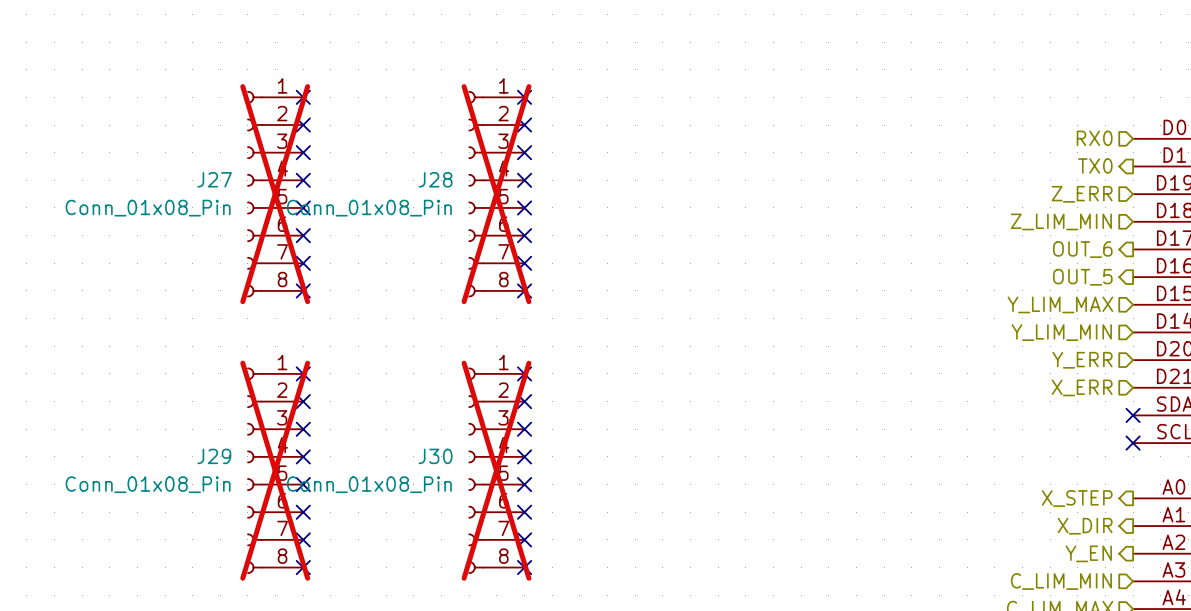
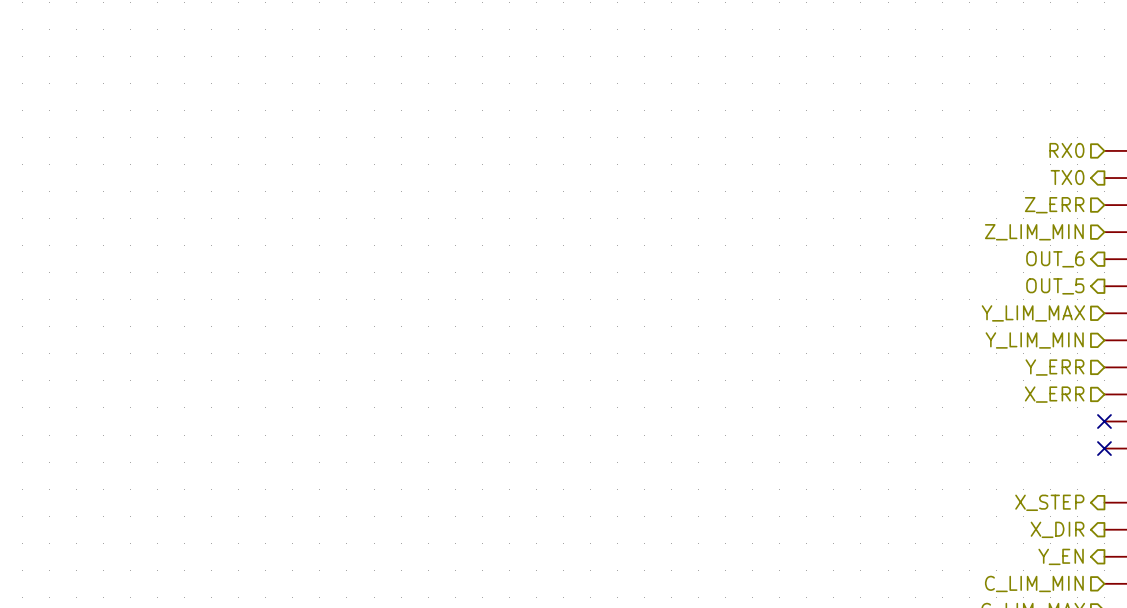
no-connect mark: (303, 97) -> none
no-connect mark: (524, 97) -> none
no-connect mark: (303, 125) -> none
no-connect mark: (524, 125) -> none
no-connect mark: (303, 152) -> none
no-connect mark: (524, 152) -> none
no-connect mark: (303, 180) -> none
no-connect mark: (524, 180) -> none
J27: Conn_01x08_Pin (275, 194) -> none
J28: Conn_01x08_Pin (496, 194) -> none
no-connect mark: (303, 207) -> none
no-connect mark: (524, 207) -> none
no-connect mark: (303, 235) -> none
no-connect mark: (524, 235) -> none
no-connect mark: (303, 263) -> none
no-connect mark: (524, 263) -> none
no-connect mark: (303, 290) -> none
no-connect mark: (524, 290) -> none
no-connect mark: (303, 373) -> none
no-connect mark: (524, 373) -> none
no-connect mark: (303, 401) -> none
no-connect mark: (524, 401) -> none
no-connect mark: (303, 429) -> none
no-connect mark: (524, 429) -> none
no-connect mark: (303, 456) -> none
no-connect mark: (524, 456) -> none
J29: Conn_01x08_Pin (275, 470) -> none
J30: Conn_01x08_Pin (496, 470) -> none
no-connect mark: (303, 484) -> none
no-connect mark: (524, 484) -> none
no-connect mark: (303, 512) -> none
no-connect mark: (524, 512) -> none
no-connect mark: (303, 539) -> none
no-connect mark: (524, 539) -> none
no-connect mark: (303, 567) -> none
no-connect mark: (524, 567) -> none

